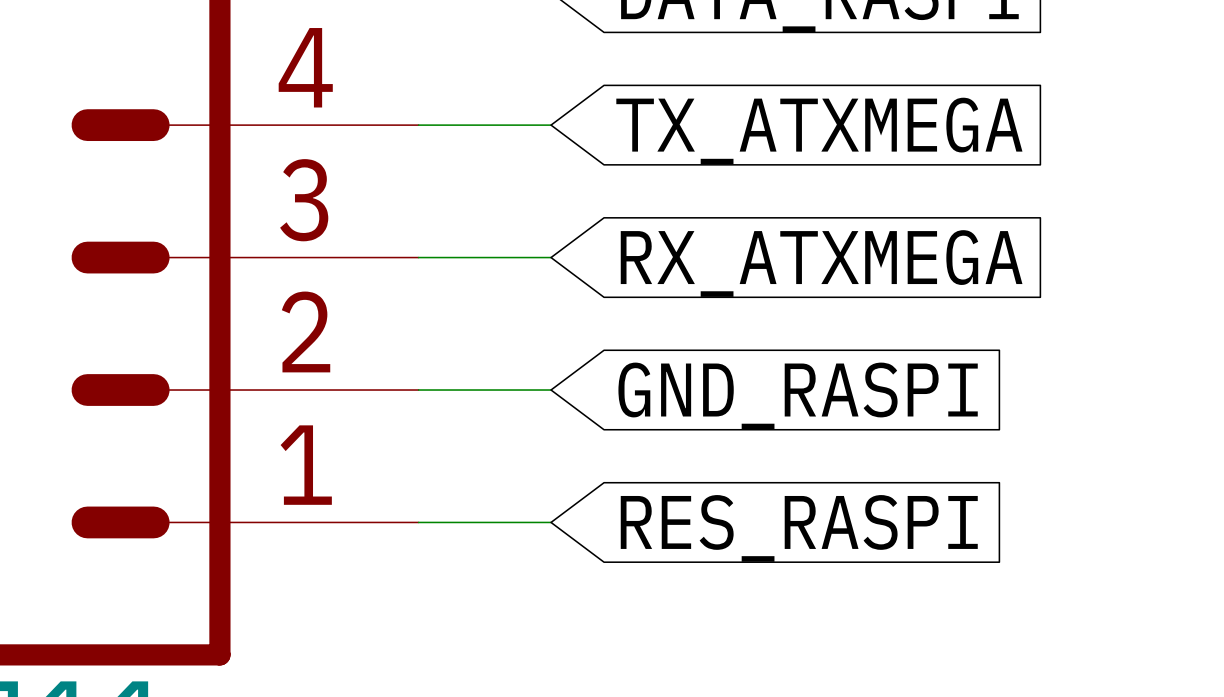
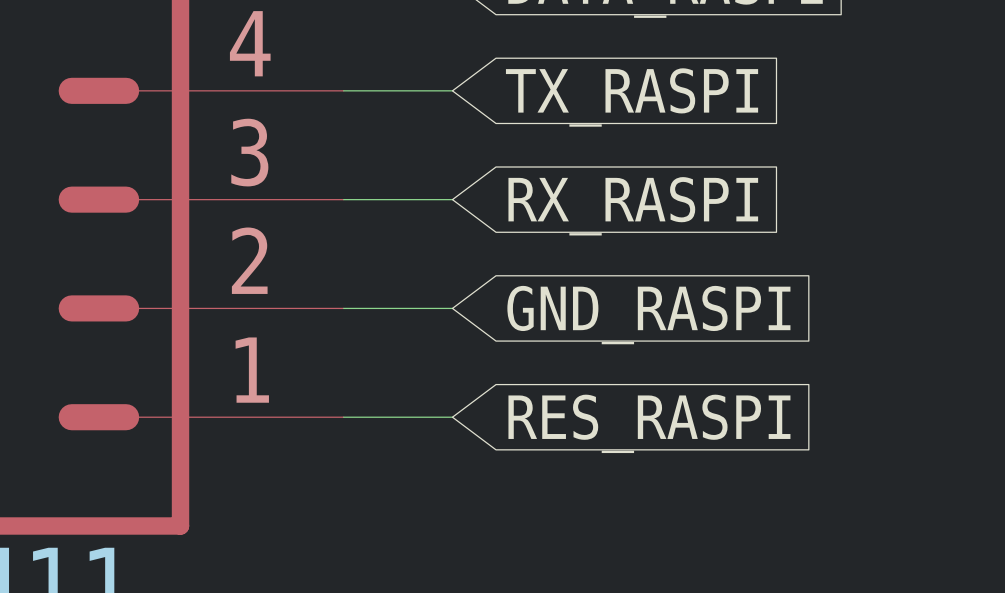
global label: TX_ATXMEGA (819, 131) -> TX_RASPI (632, 97)
global label: RX_ATXMEGA (821, 263) -> RX_RASPI (633, 206)

